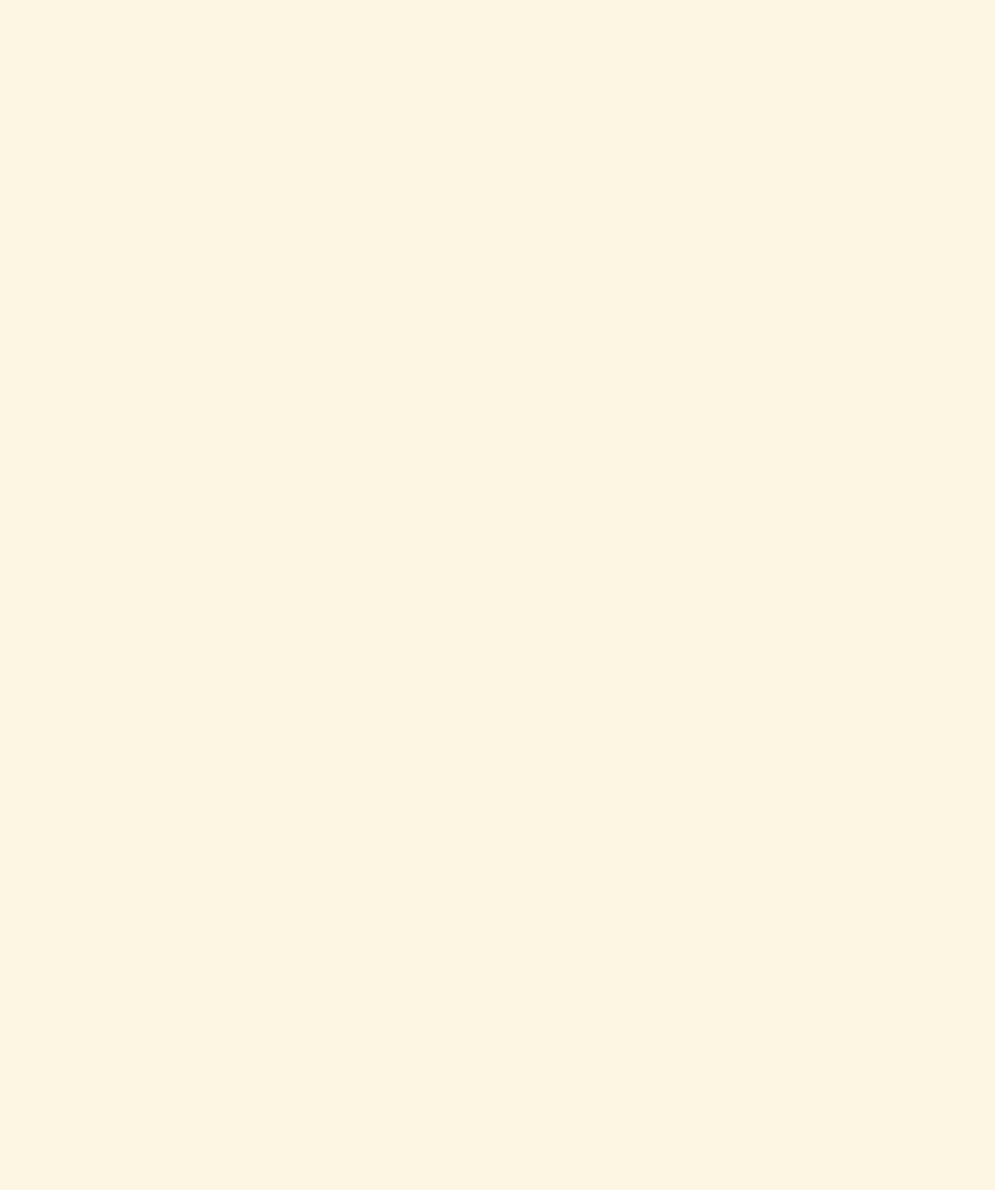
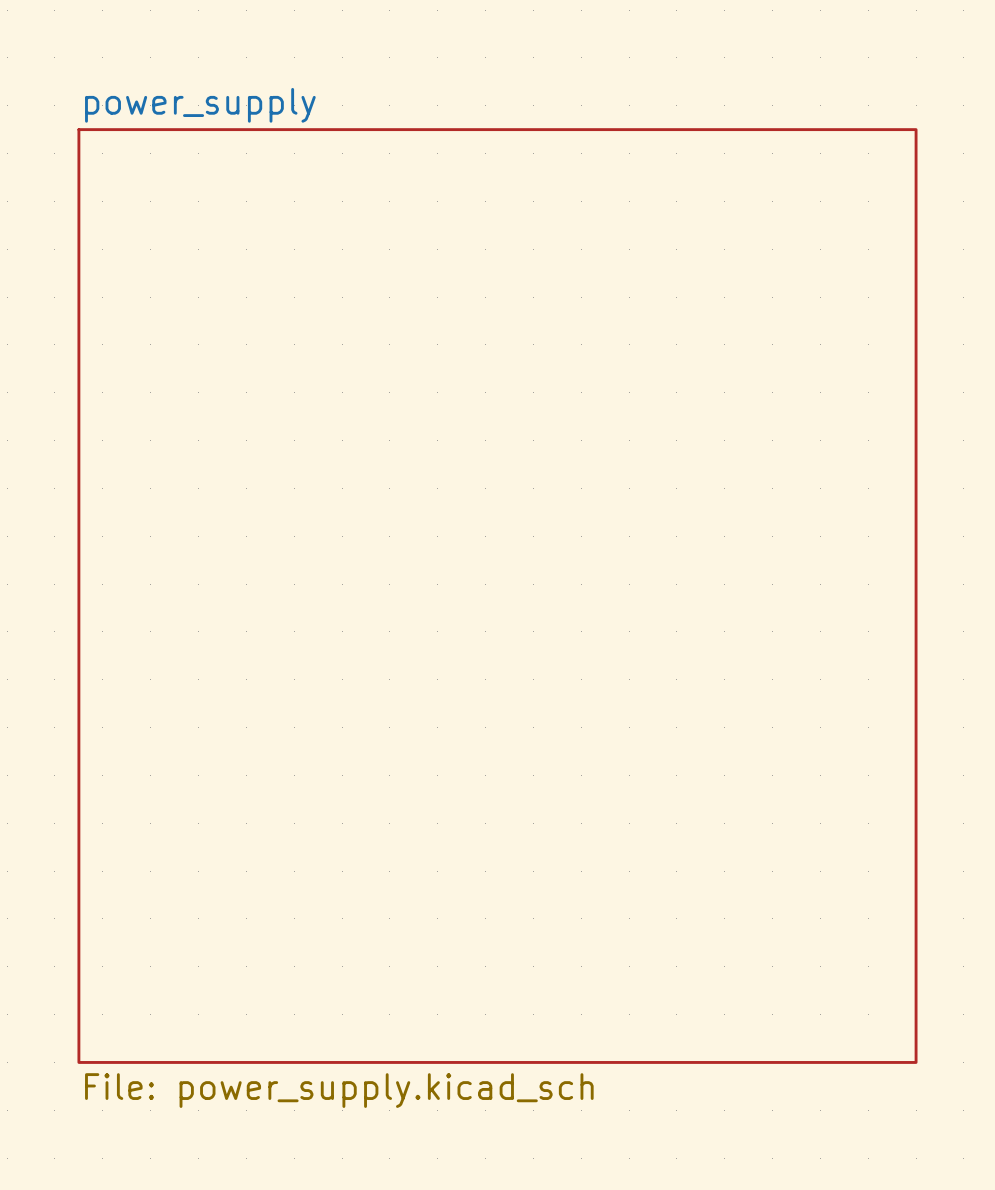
sheet power_supply: none -> File: power_supply.kicad_sch (497, 596)

